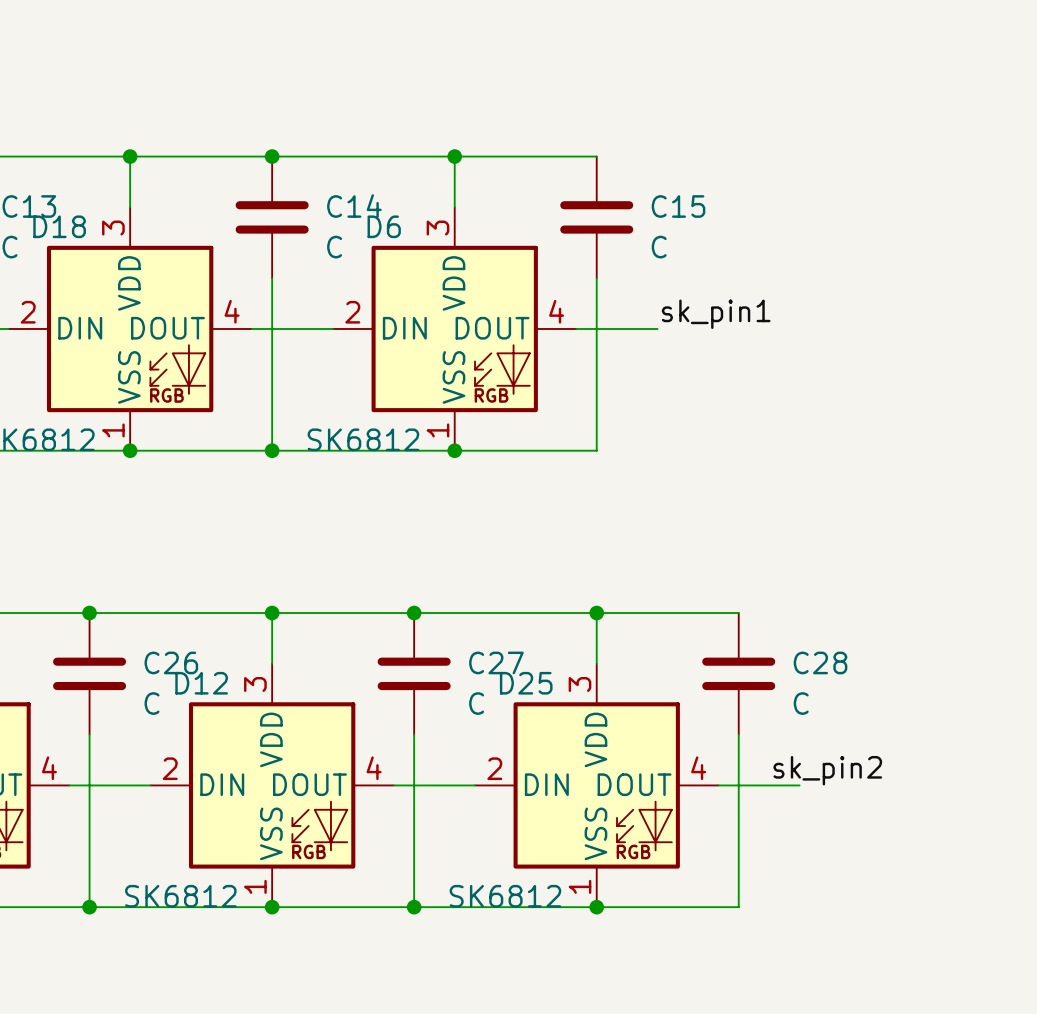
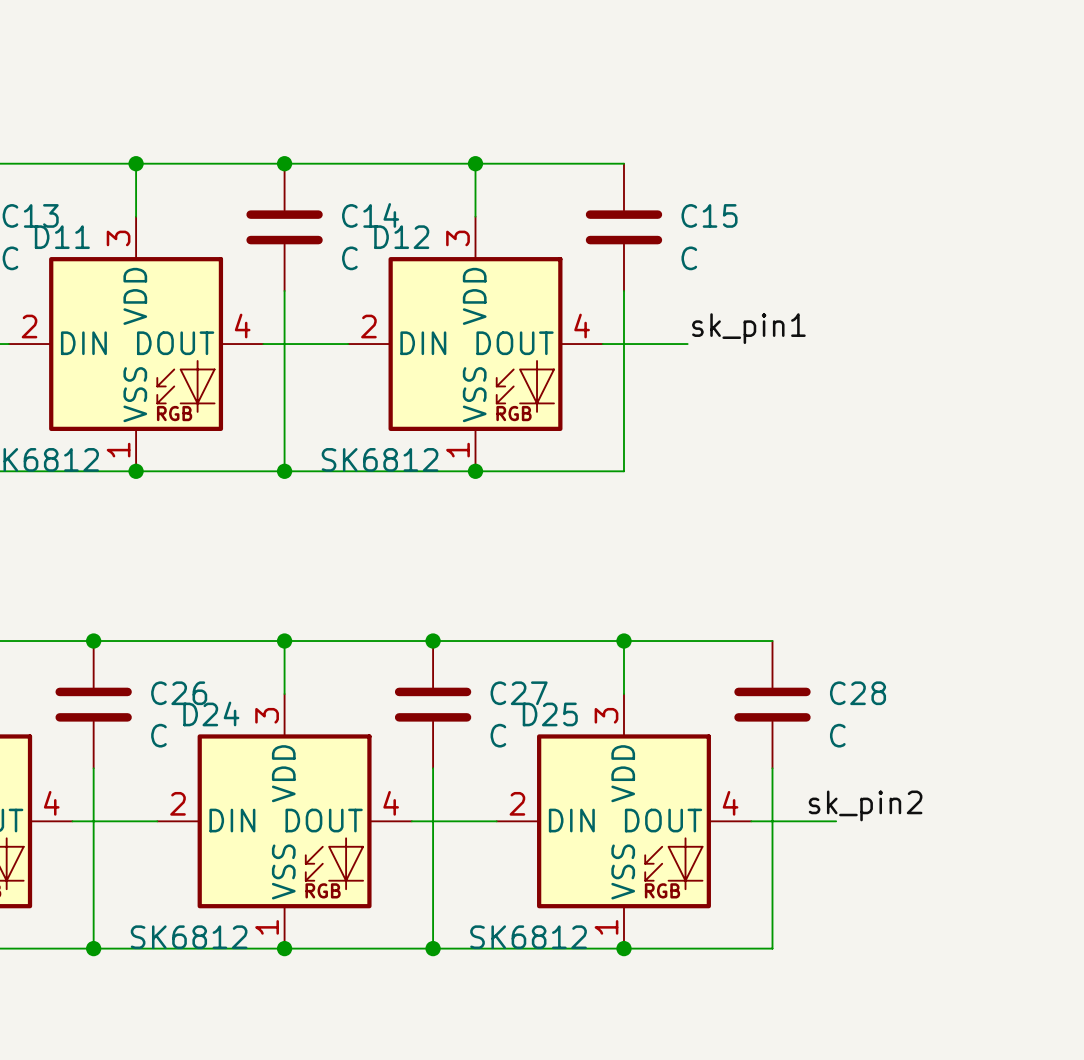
D18 name: D18 (59, 226) -> D11 (62, 237)
D6 name: D6 (384, 226) -> D12 (401, 237)
D12 name: D12 (201, 683) -> D24 (211, 713)

